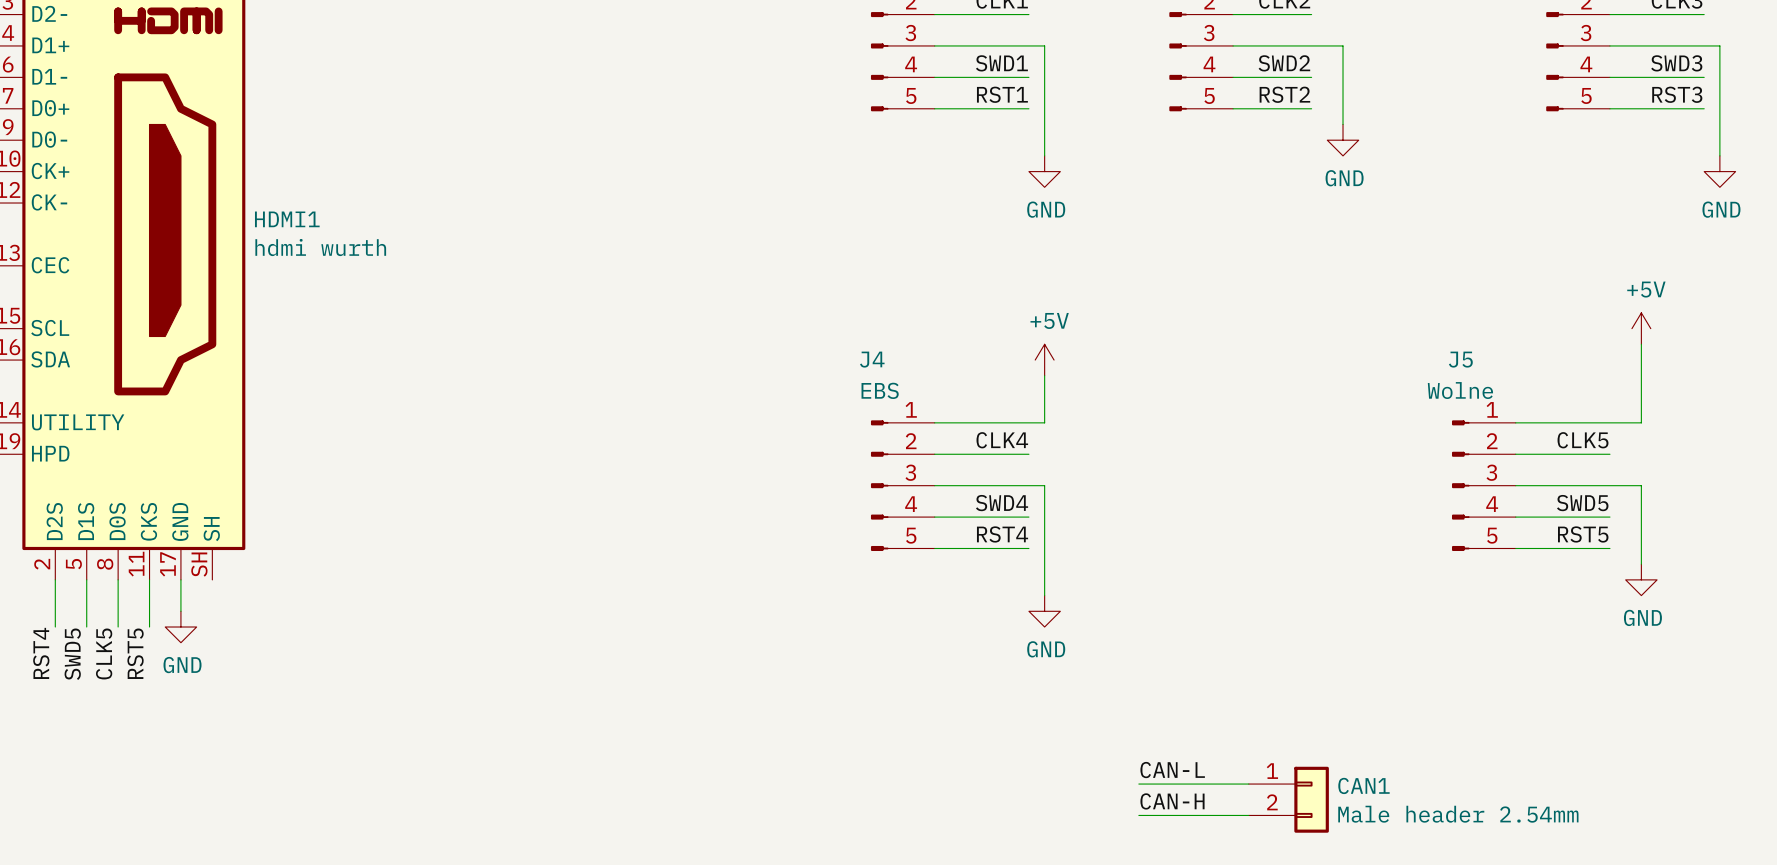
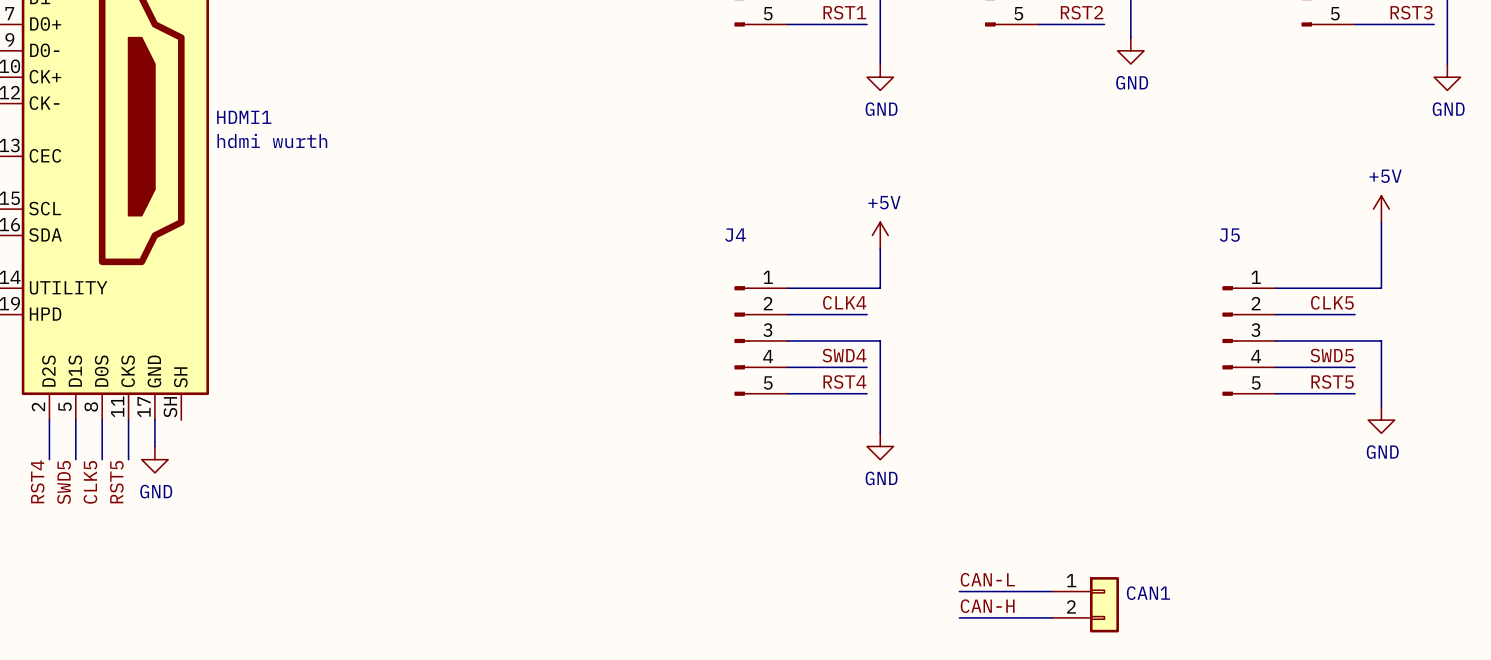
J4 value: EBS (880, 390) -> none
J5 value: Wolne (1460, 390) -> none
CAN1 value: Male header 2.54mm (1458, 814) -> none

